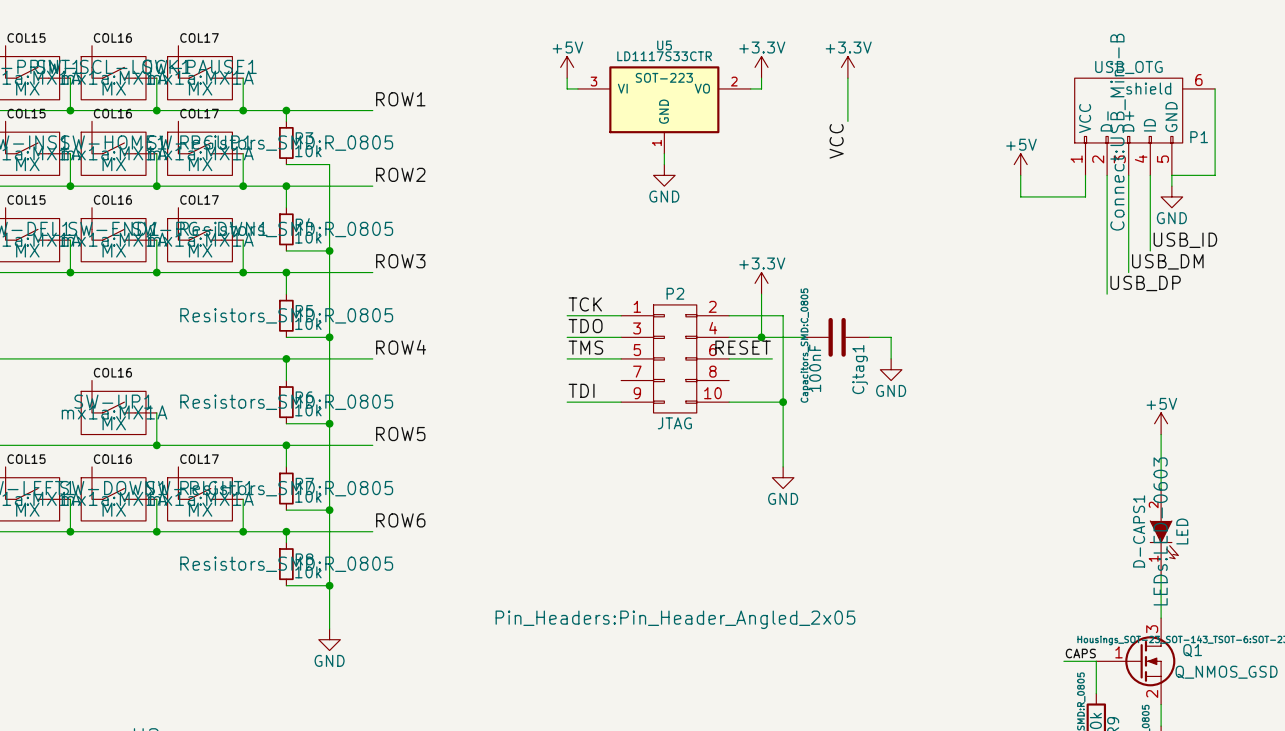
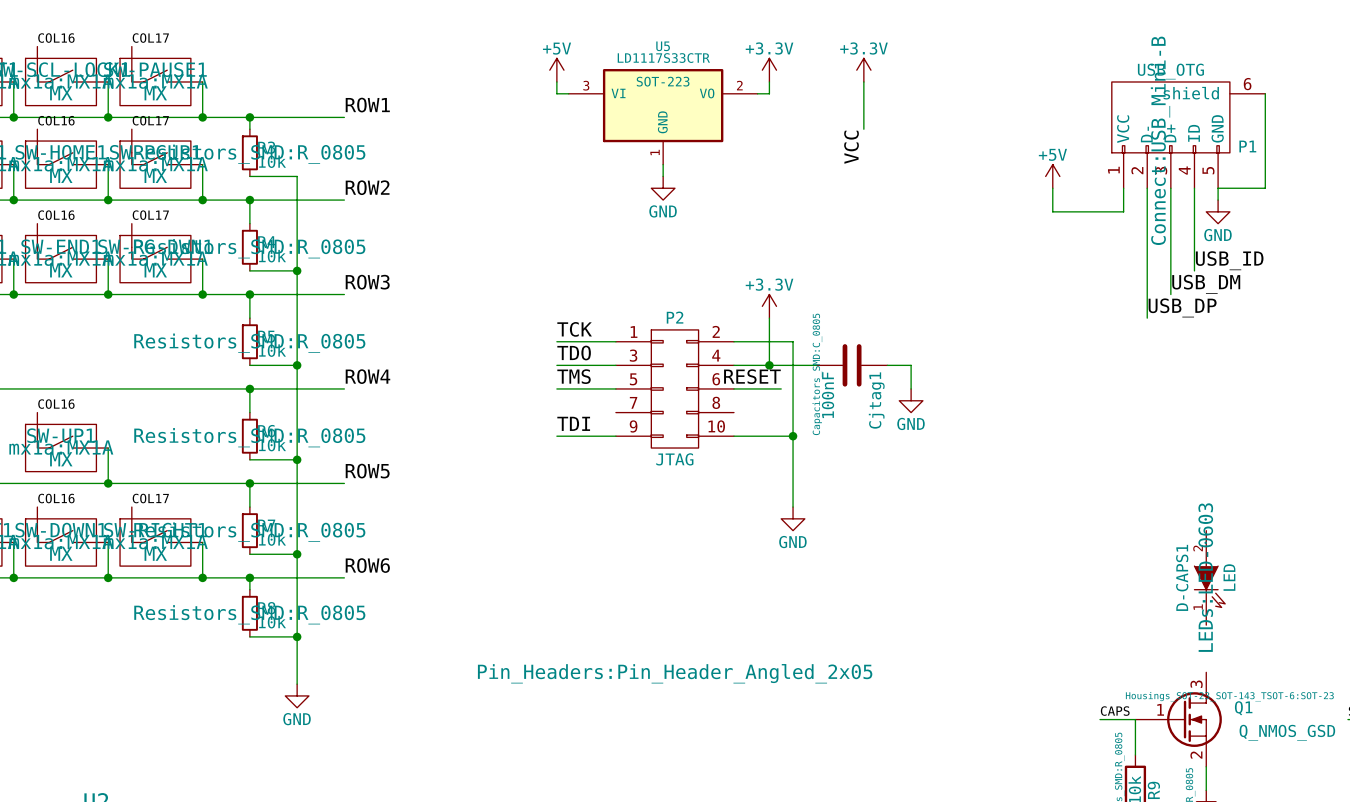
power symbol: +5V (1161, 423) -> none
wire: (1161, 434) (1161, 488) -> none
wire: (1161, 574) (1161, 618) -> none

